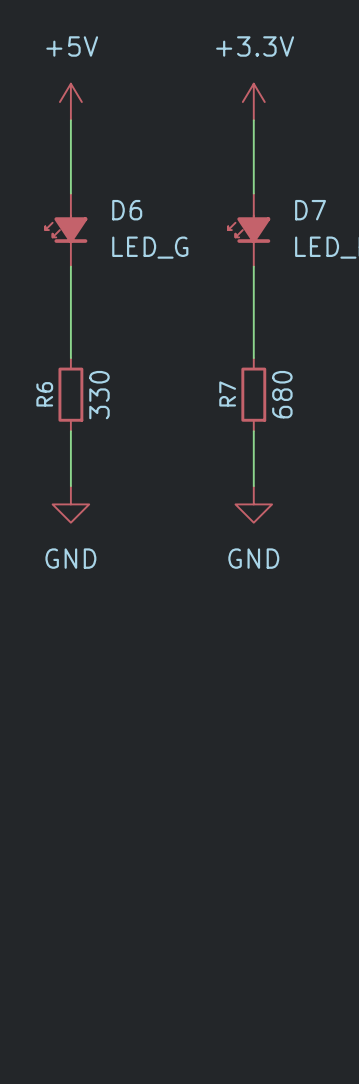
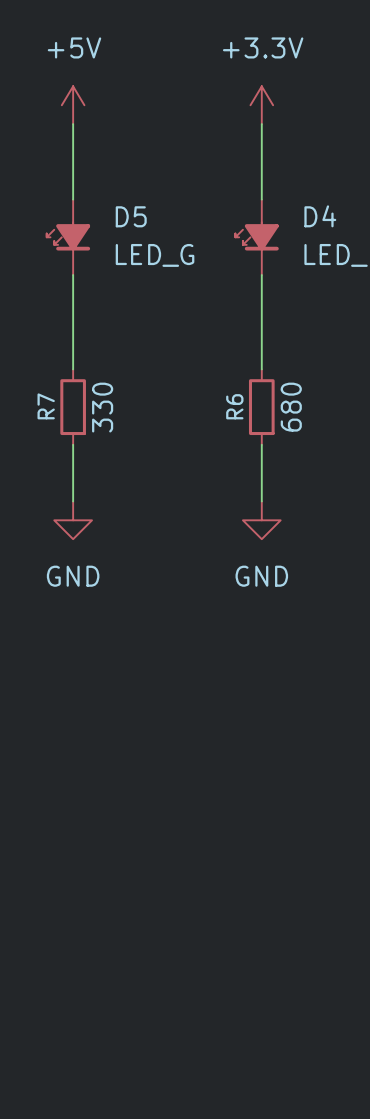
D6 name: D6 (127, 210) -> D5 (131, 216)
D7 name: D7 (310, 210) -> D4 (320, 216)
R7 name: R7 (227, 393) -> R6 (234, 406)
R6 name: R6 (44, 394) -> R7 (46, 406)

